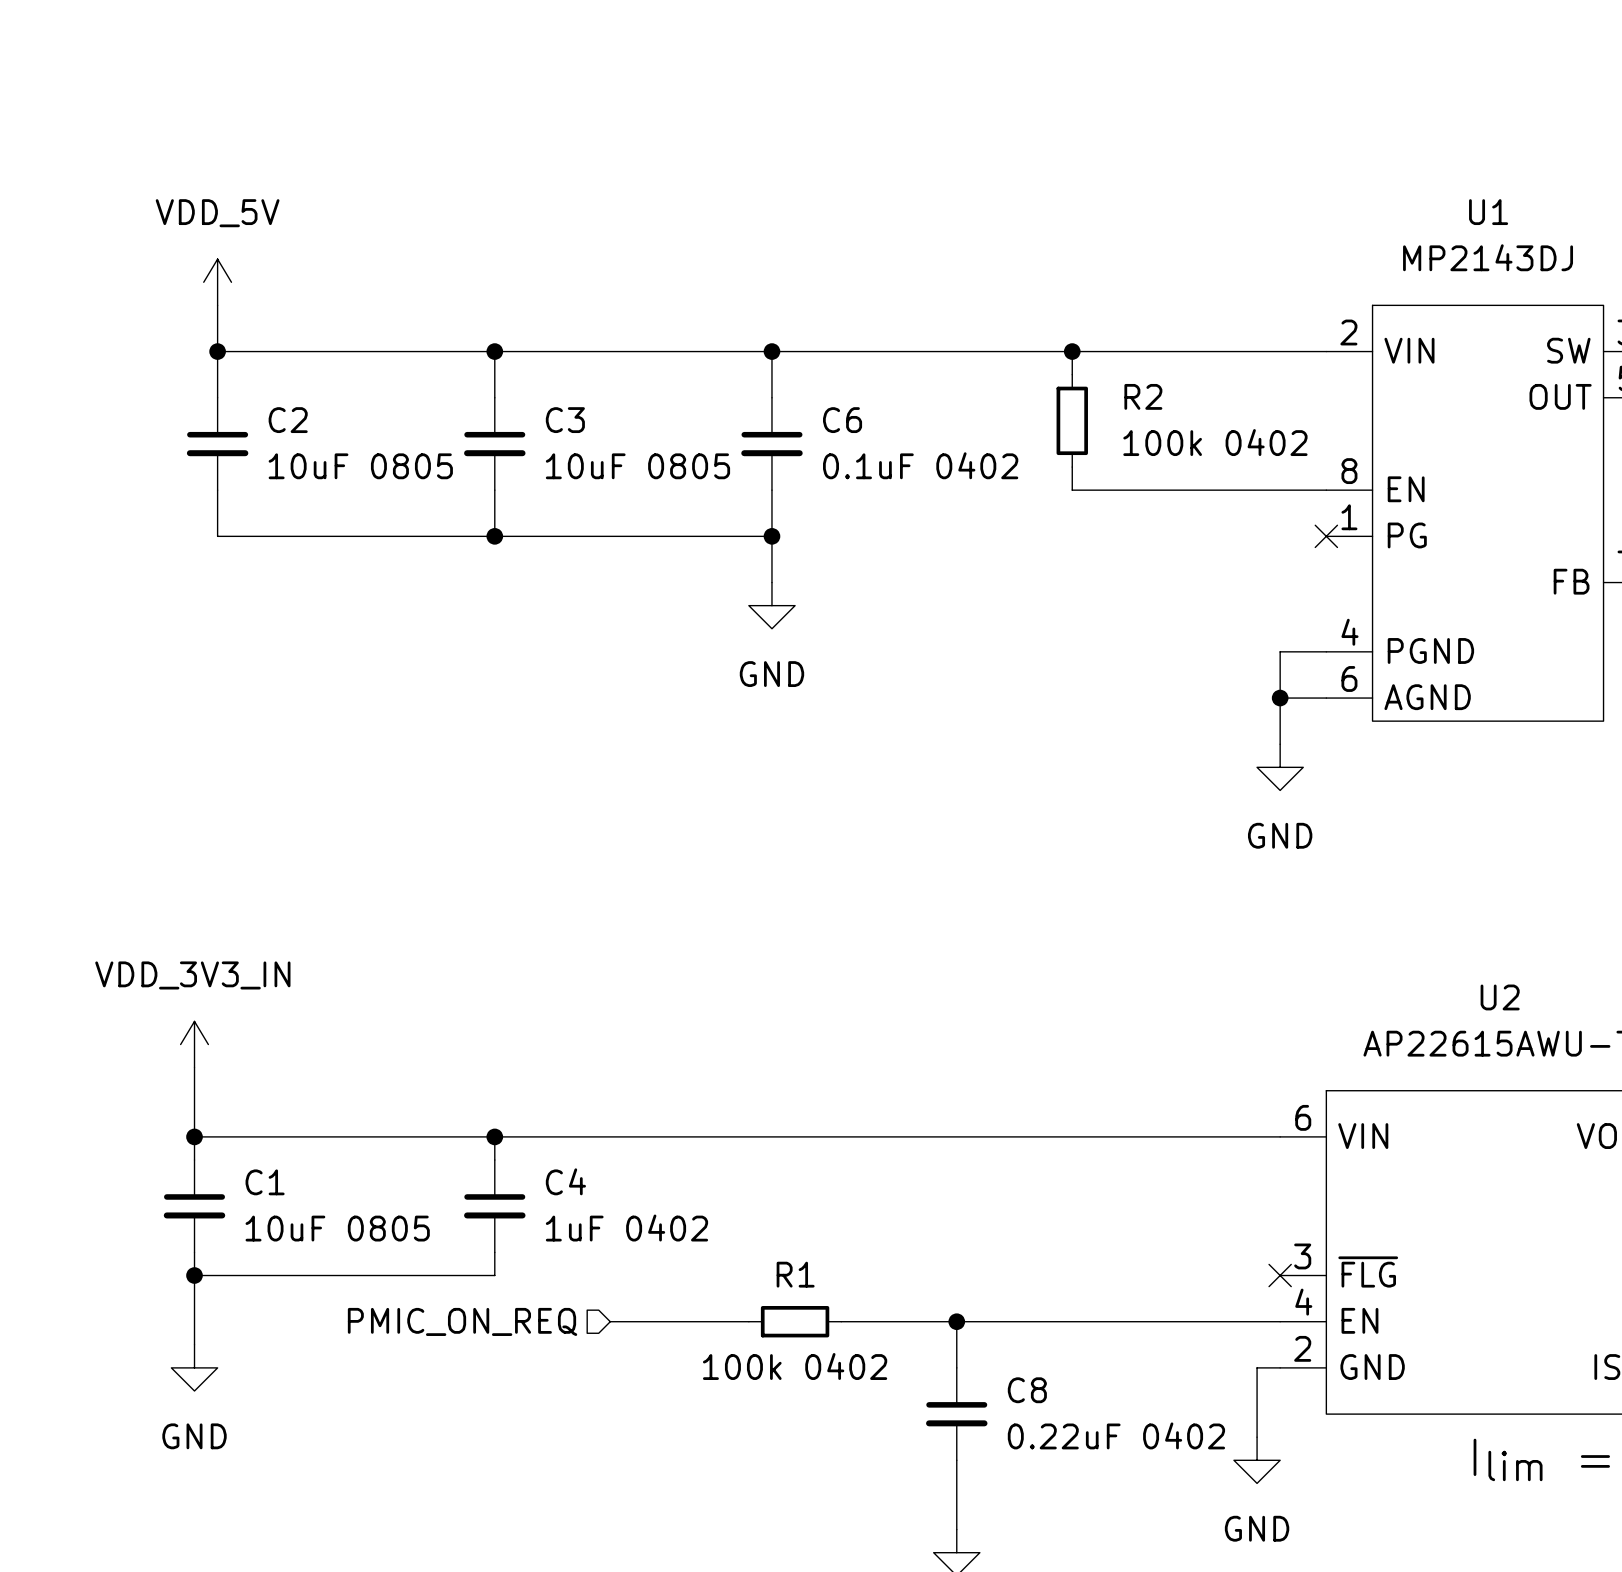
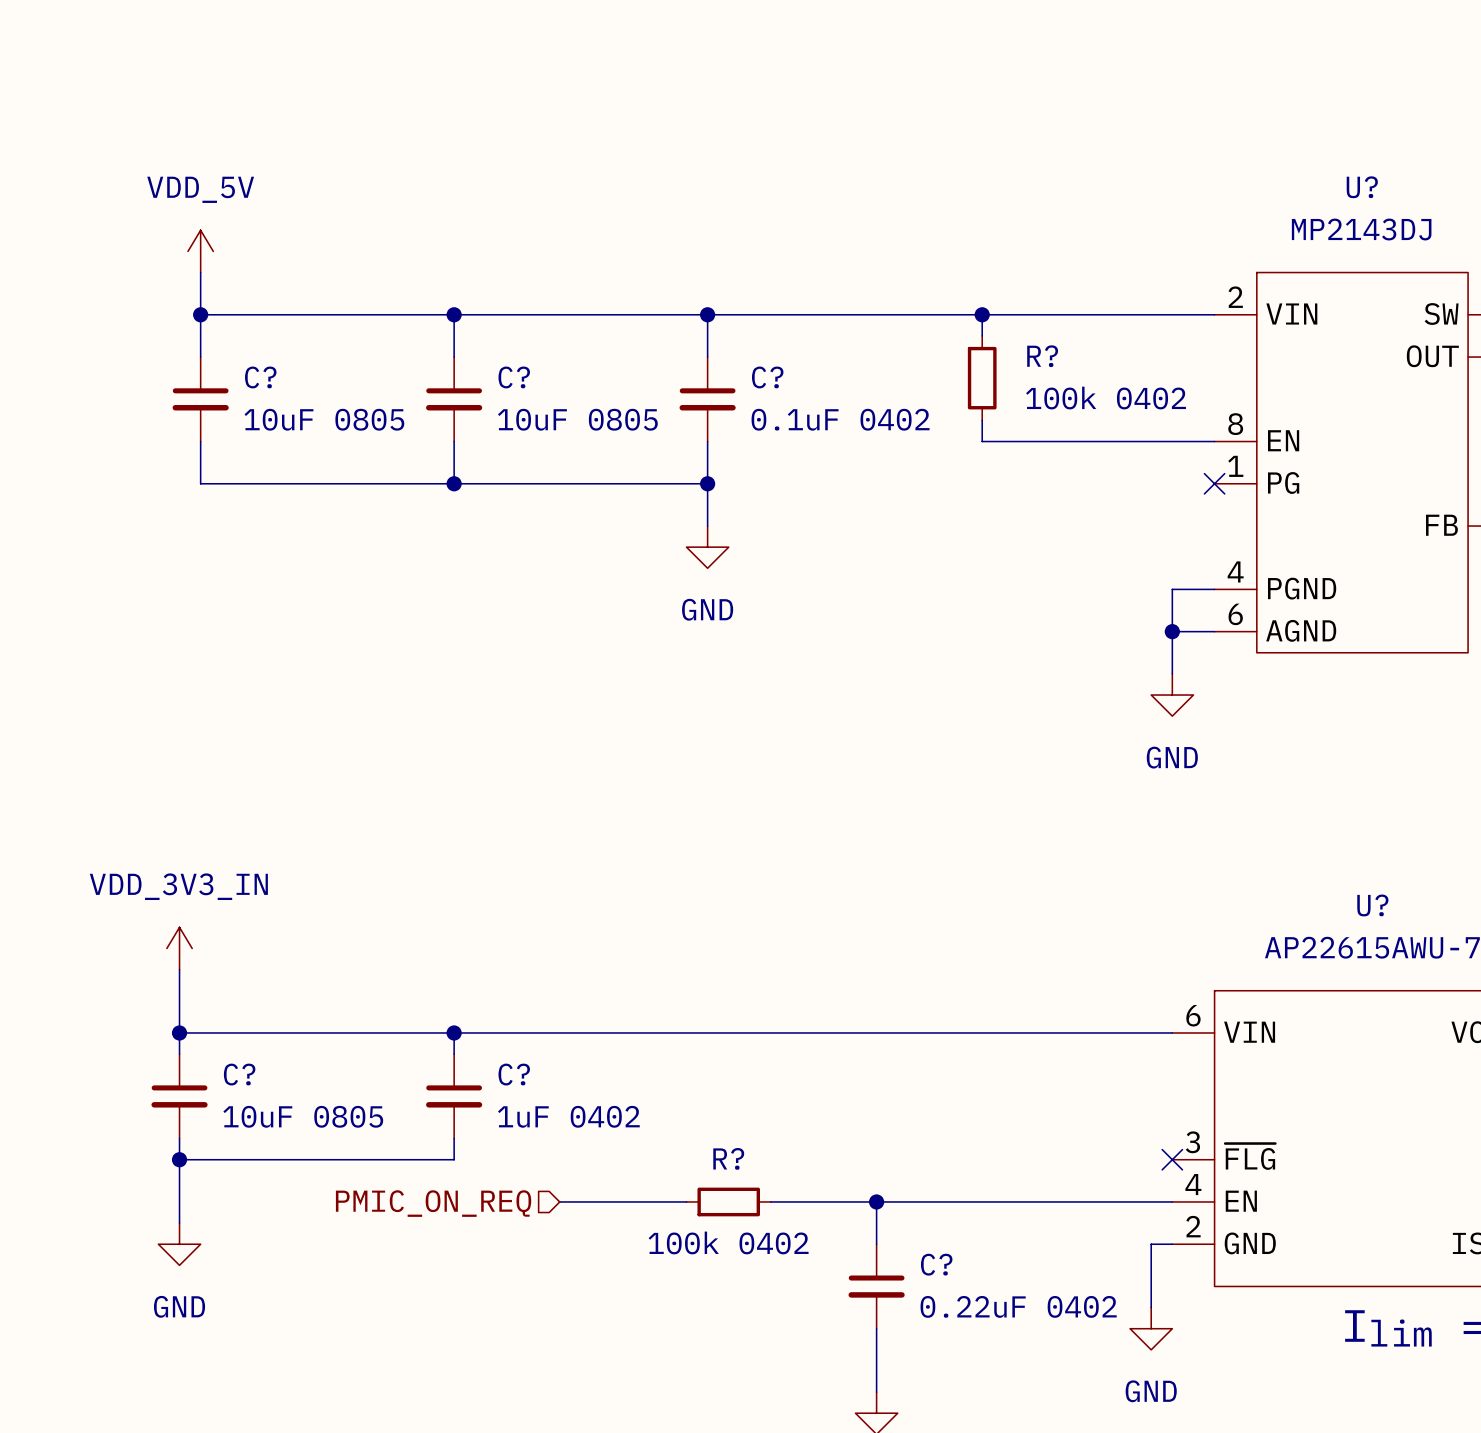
U1 name: U1 (1488, 212) -> U? (1362, 187)
R2 name: R2 (1143, 396) -> R? (1042, 356)
C2 name: C2 (288, 420) -> C? (260, 377)
C3 name: C3 (565, 420) -> C? (514, 377)
C6 name: C6 (842, 420) -> C? (767, 377)
U2 name: U2 (1500, 997) -> U? (1372, 905)
C4 name: C4 (565, 1181) -> C? (514, 1074)
C1 name: C1 (265, 1182) -> C? (239, 1074)
R1 name: R1 (795, 1274) -> R? (728, 1158)
C8 name: C8 (1027, 1390) -> C? (936, 1264)

